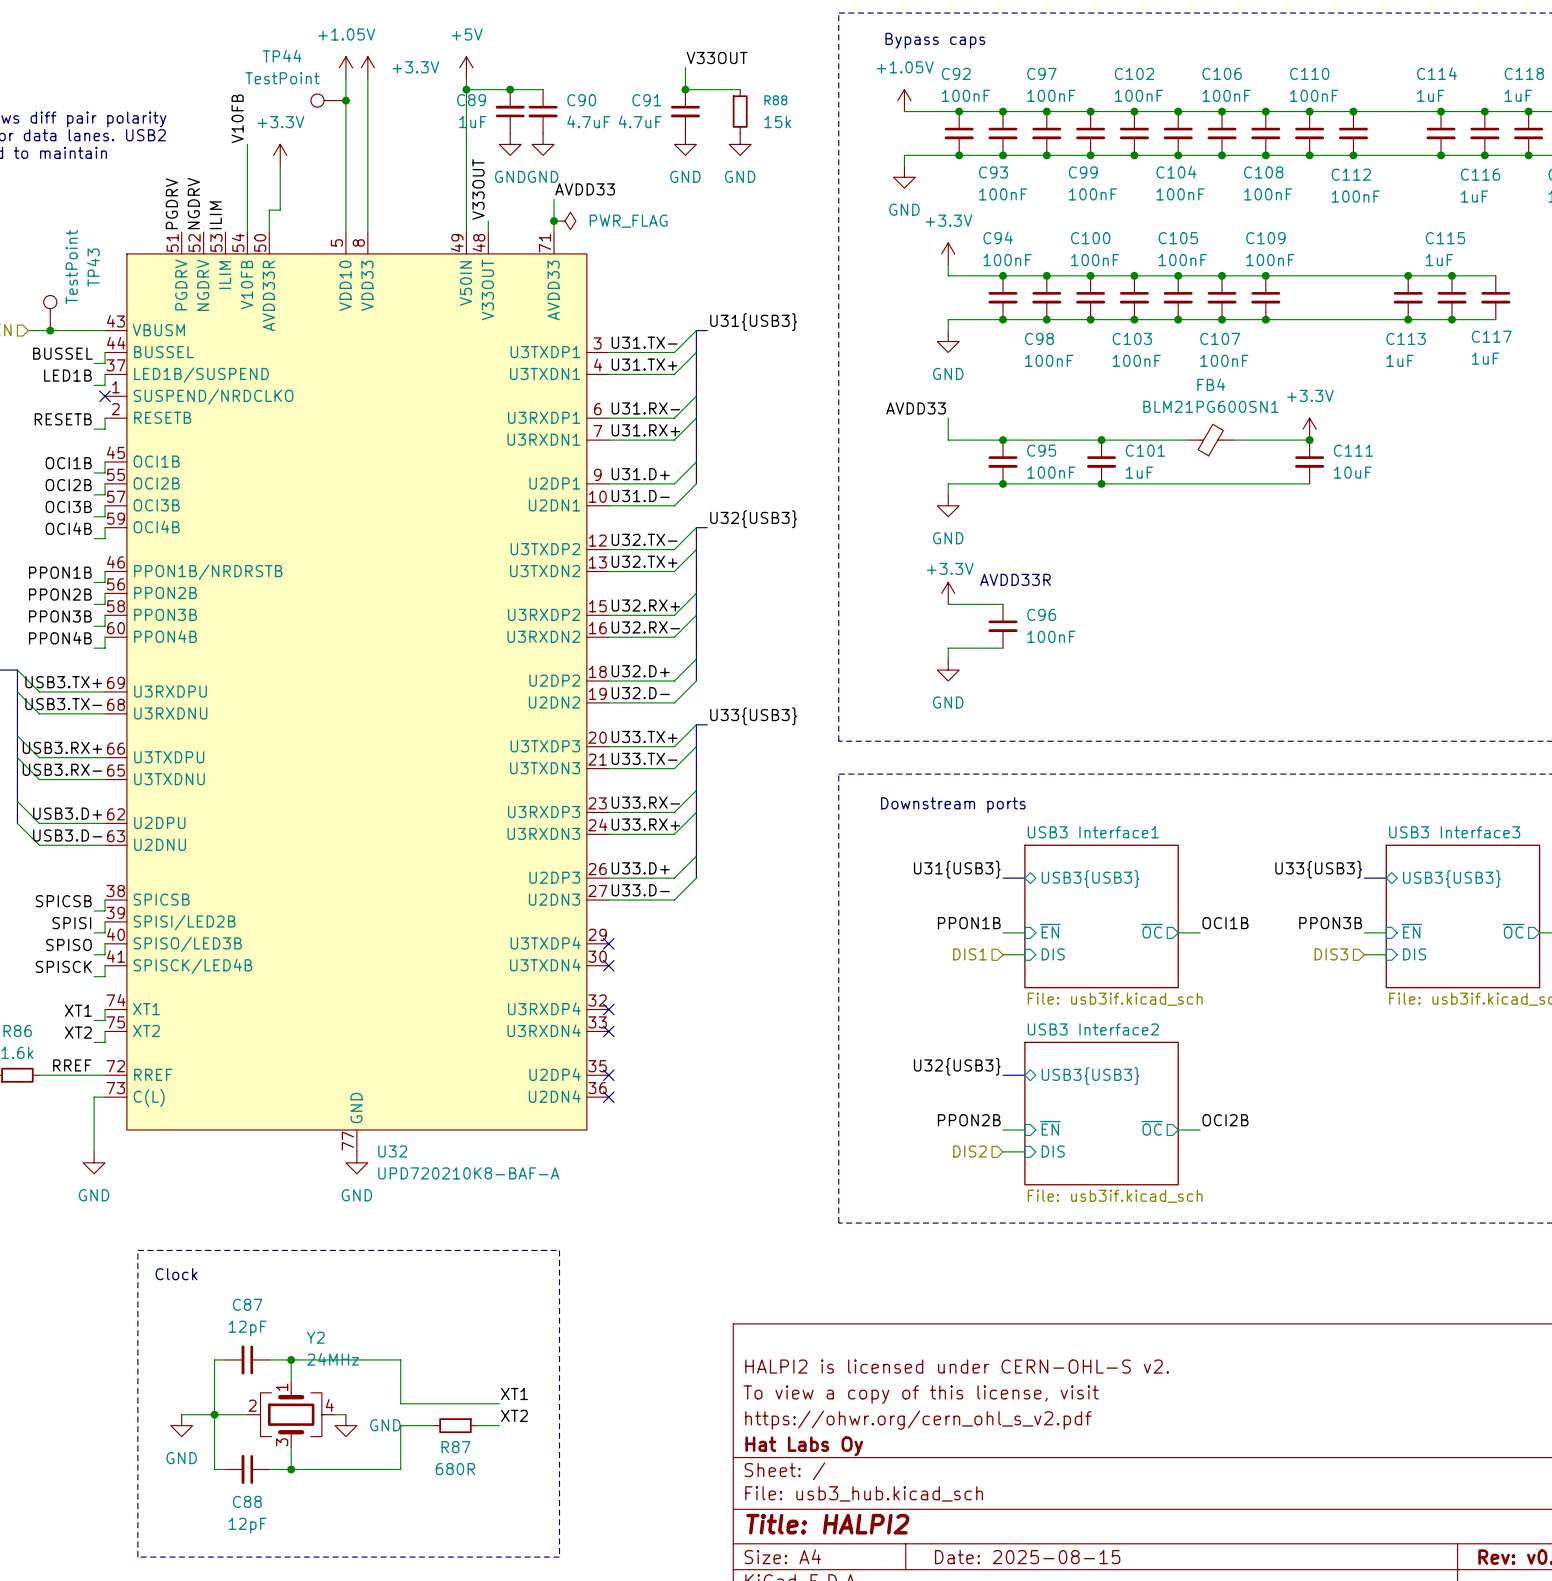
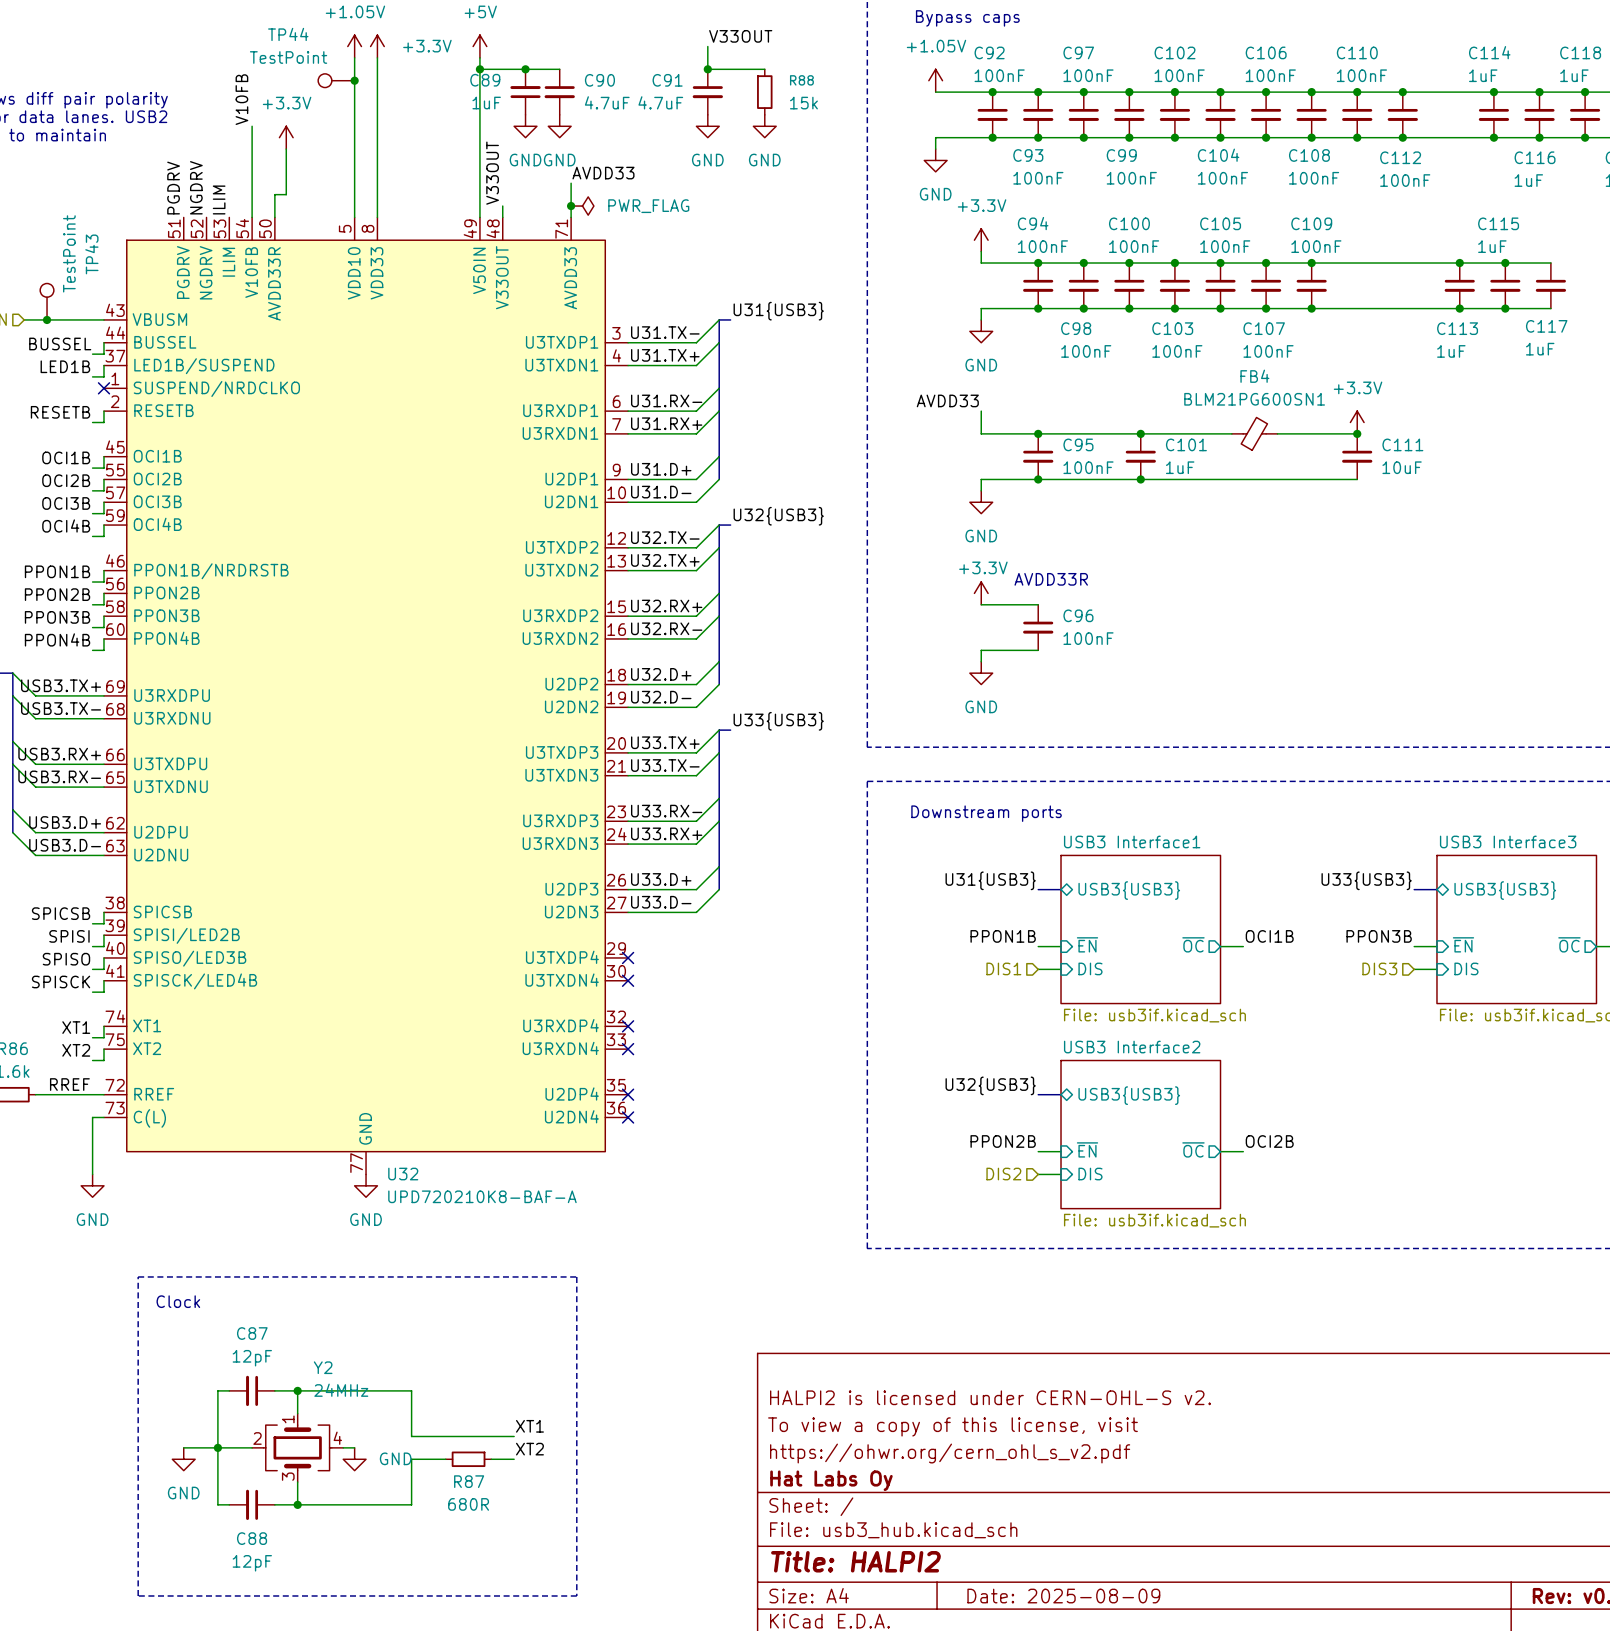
title block: Date: 2025-08-15 (1027, 1557) -> Date: 2025-08-09 (1063, 1596)

